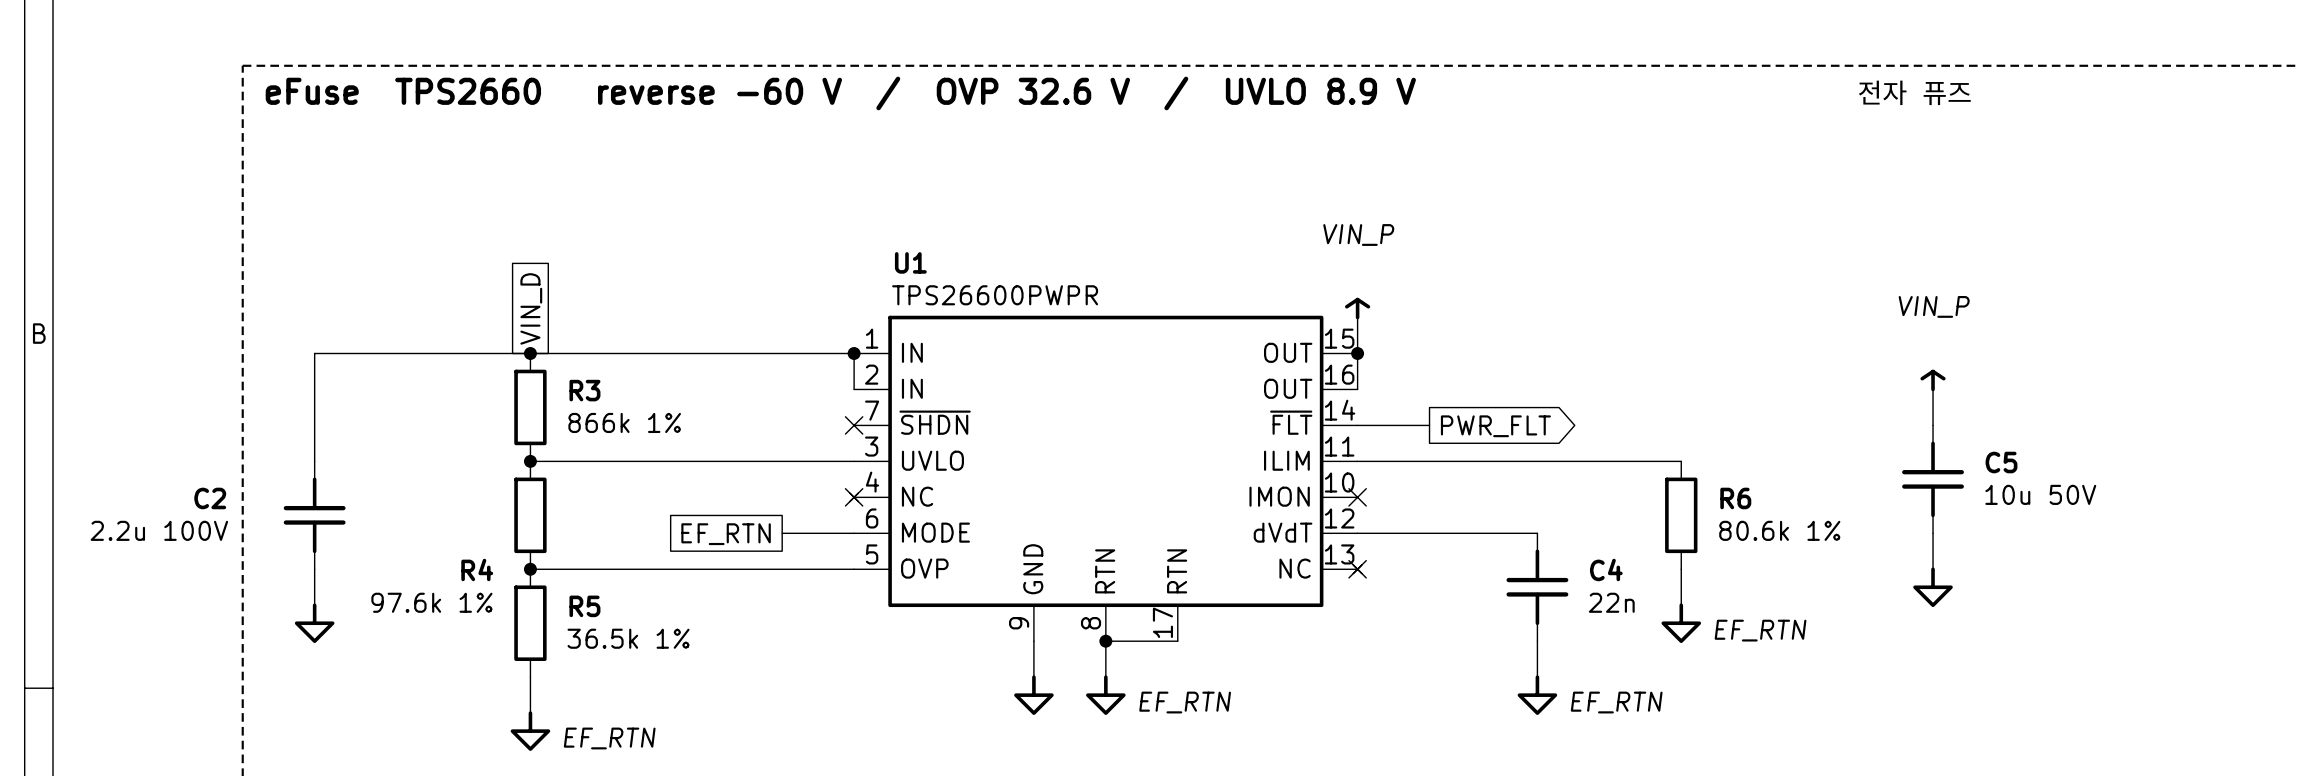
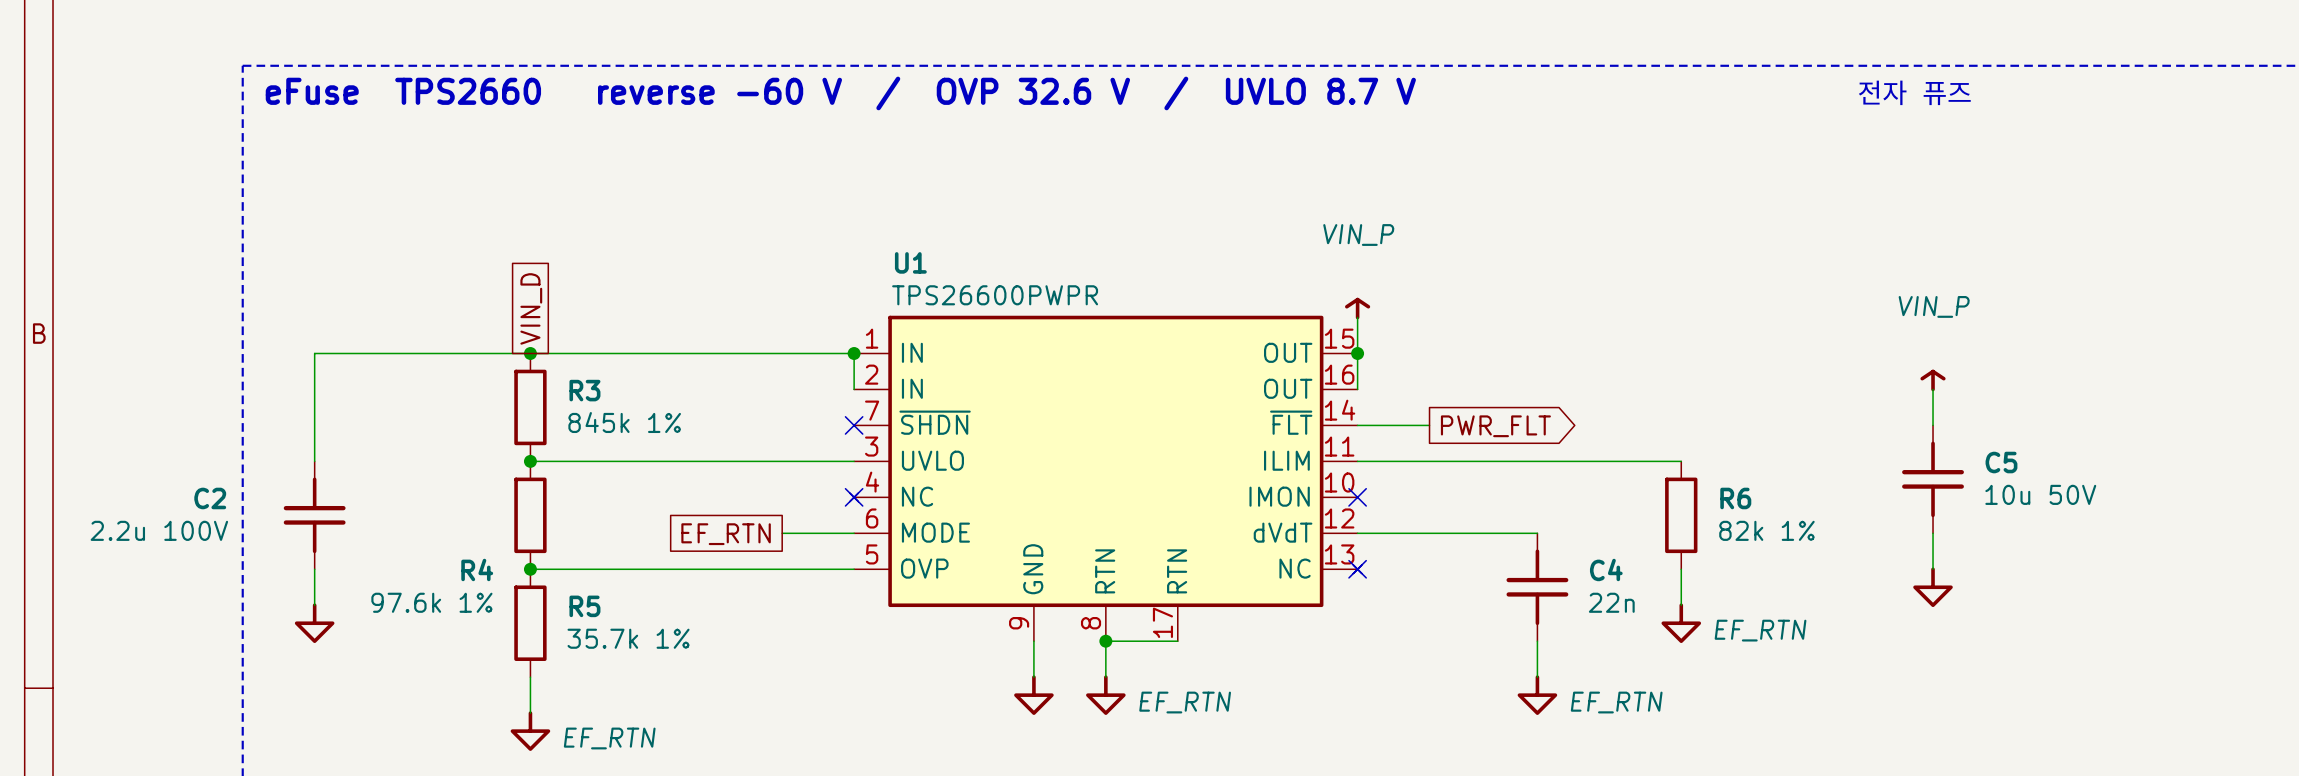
text: eFuse TPS2660 reverse -60 V / OVP 32.6 V / UVLO 8.9 V (840, 93) -> eFuse TPS2660 reverse -60 V / OVP 32.6 V / UVLO 8.7 V (840, 93)
R3 value: 866k 1% (624, 422) -> 845k 1% (624, 422)
R6 value: 80.6k 1% (1779, 530) -> 82k 1% (1766, 530)
R5 value: 36.5k 1% (628, 638) -> 35.7k 1% (628, 638)

